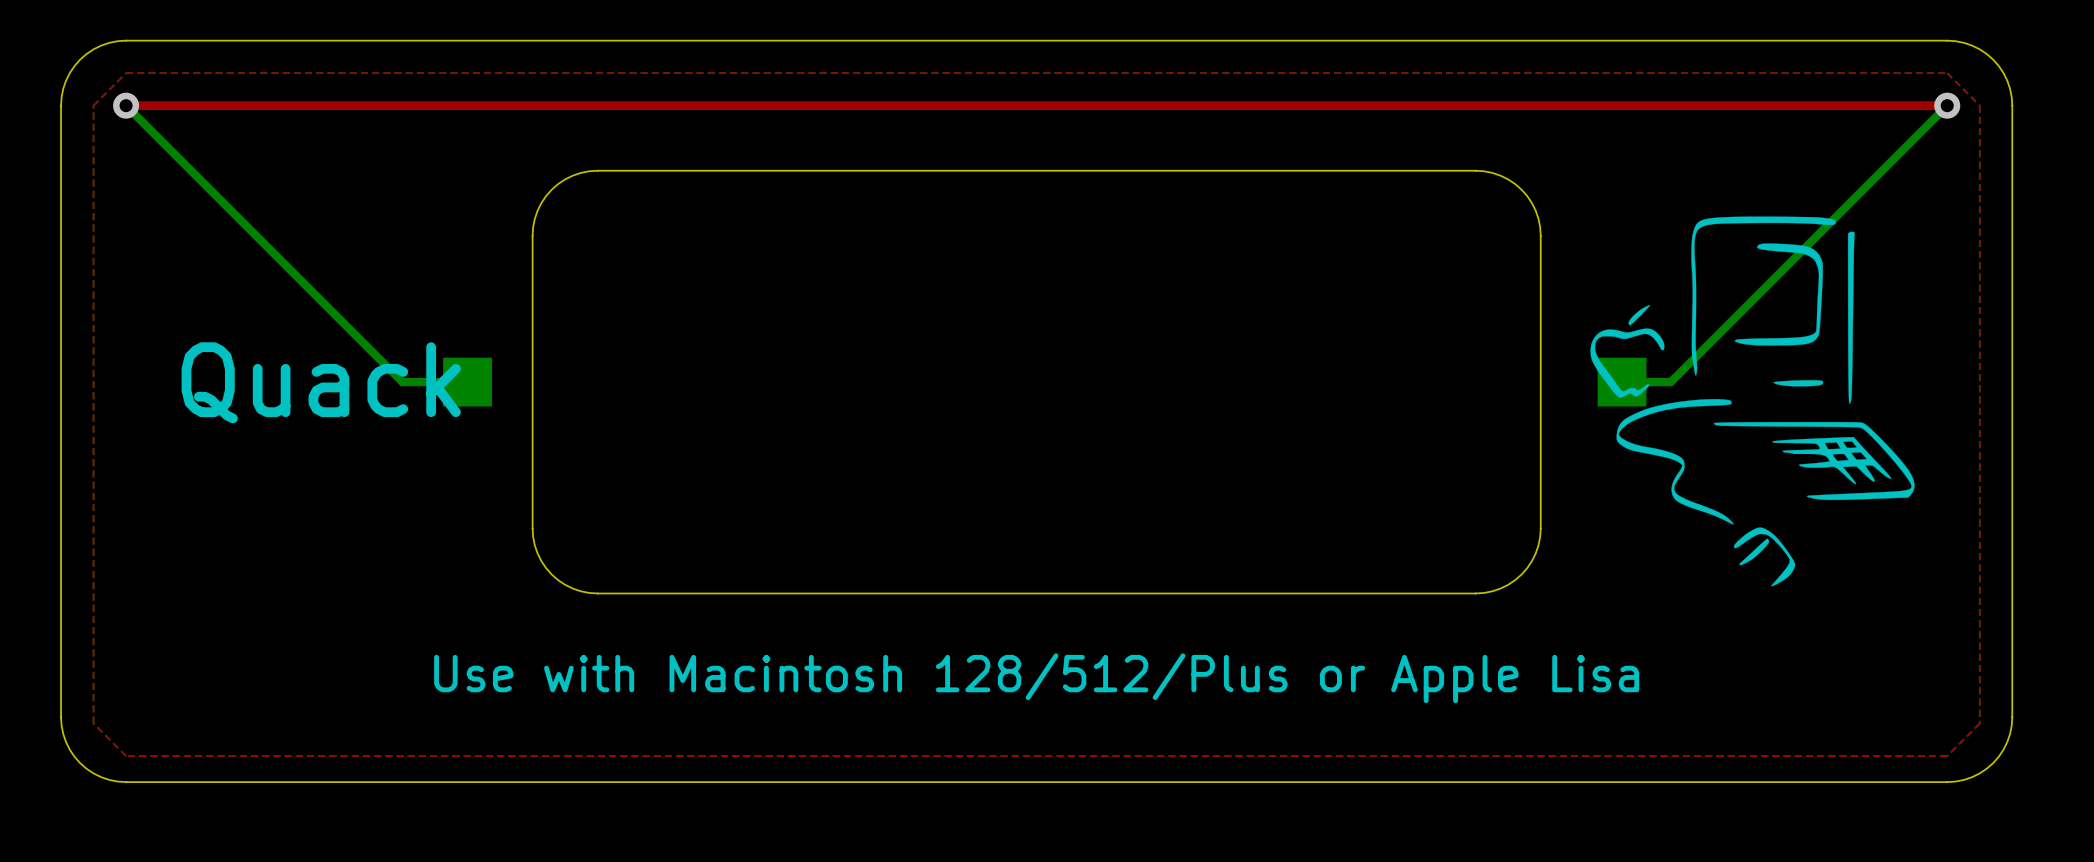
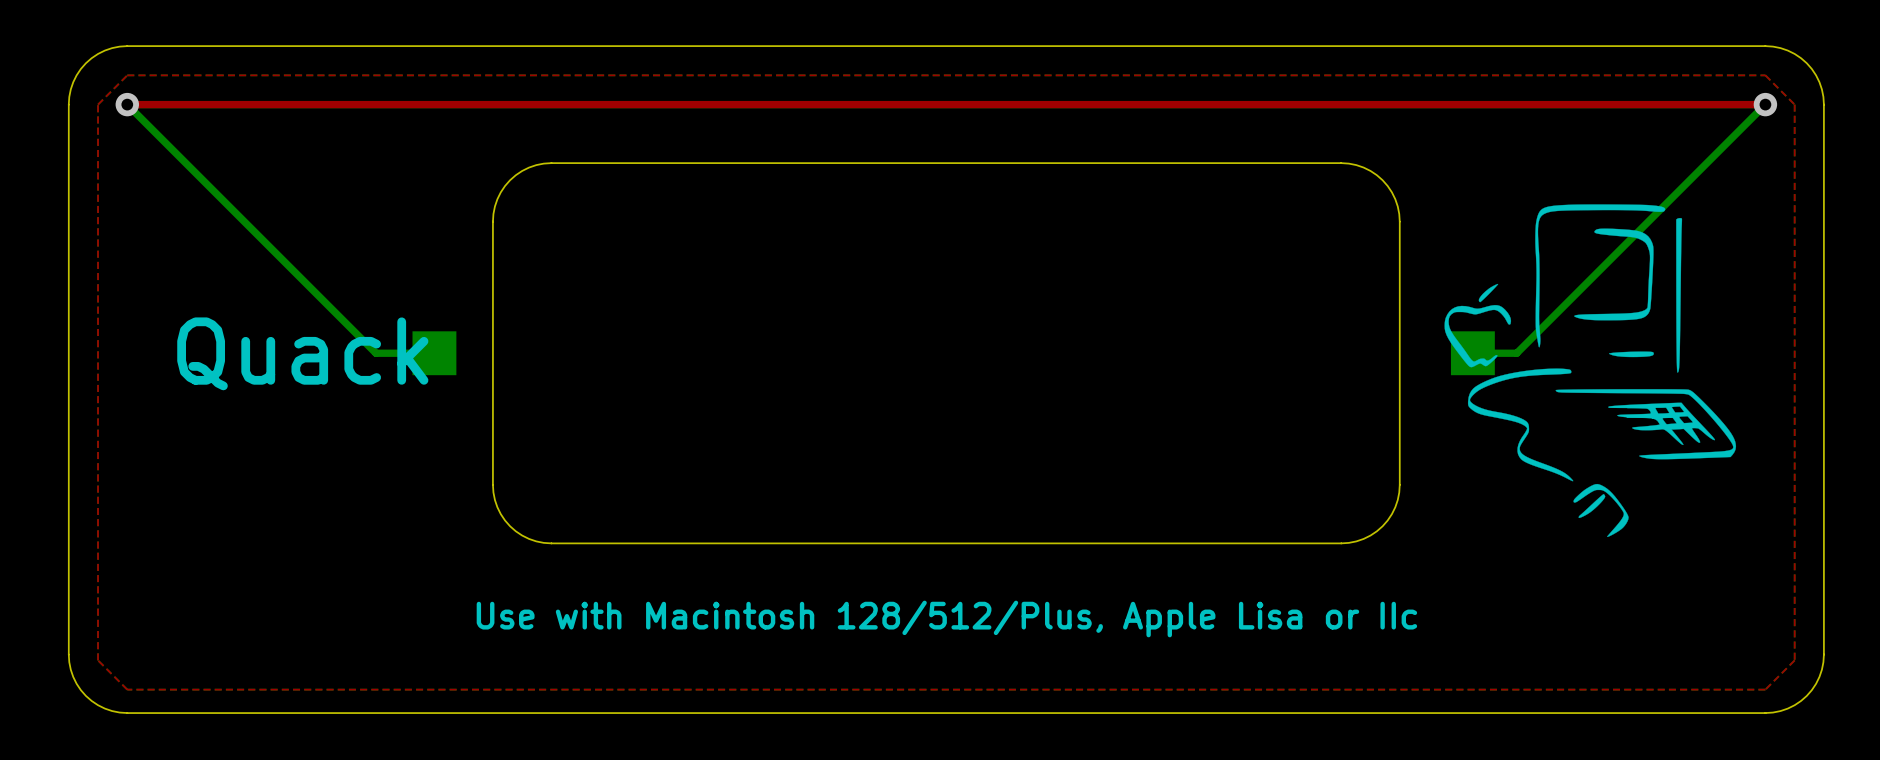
text: Use with Macintosh 128/512/Plus or Apple Lisa (1036, 678) -> Use with Macintosh 128/512/Plus, Apple Lisa or IIc (946, 618)

